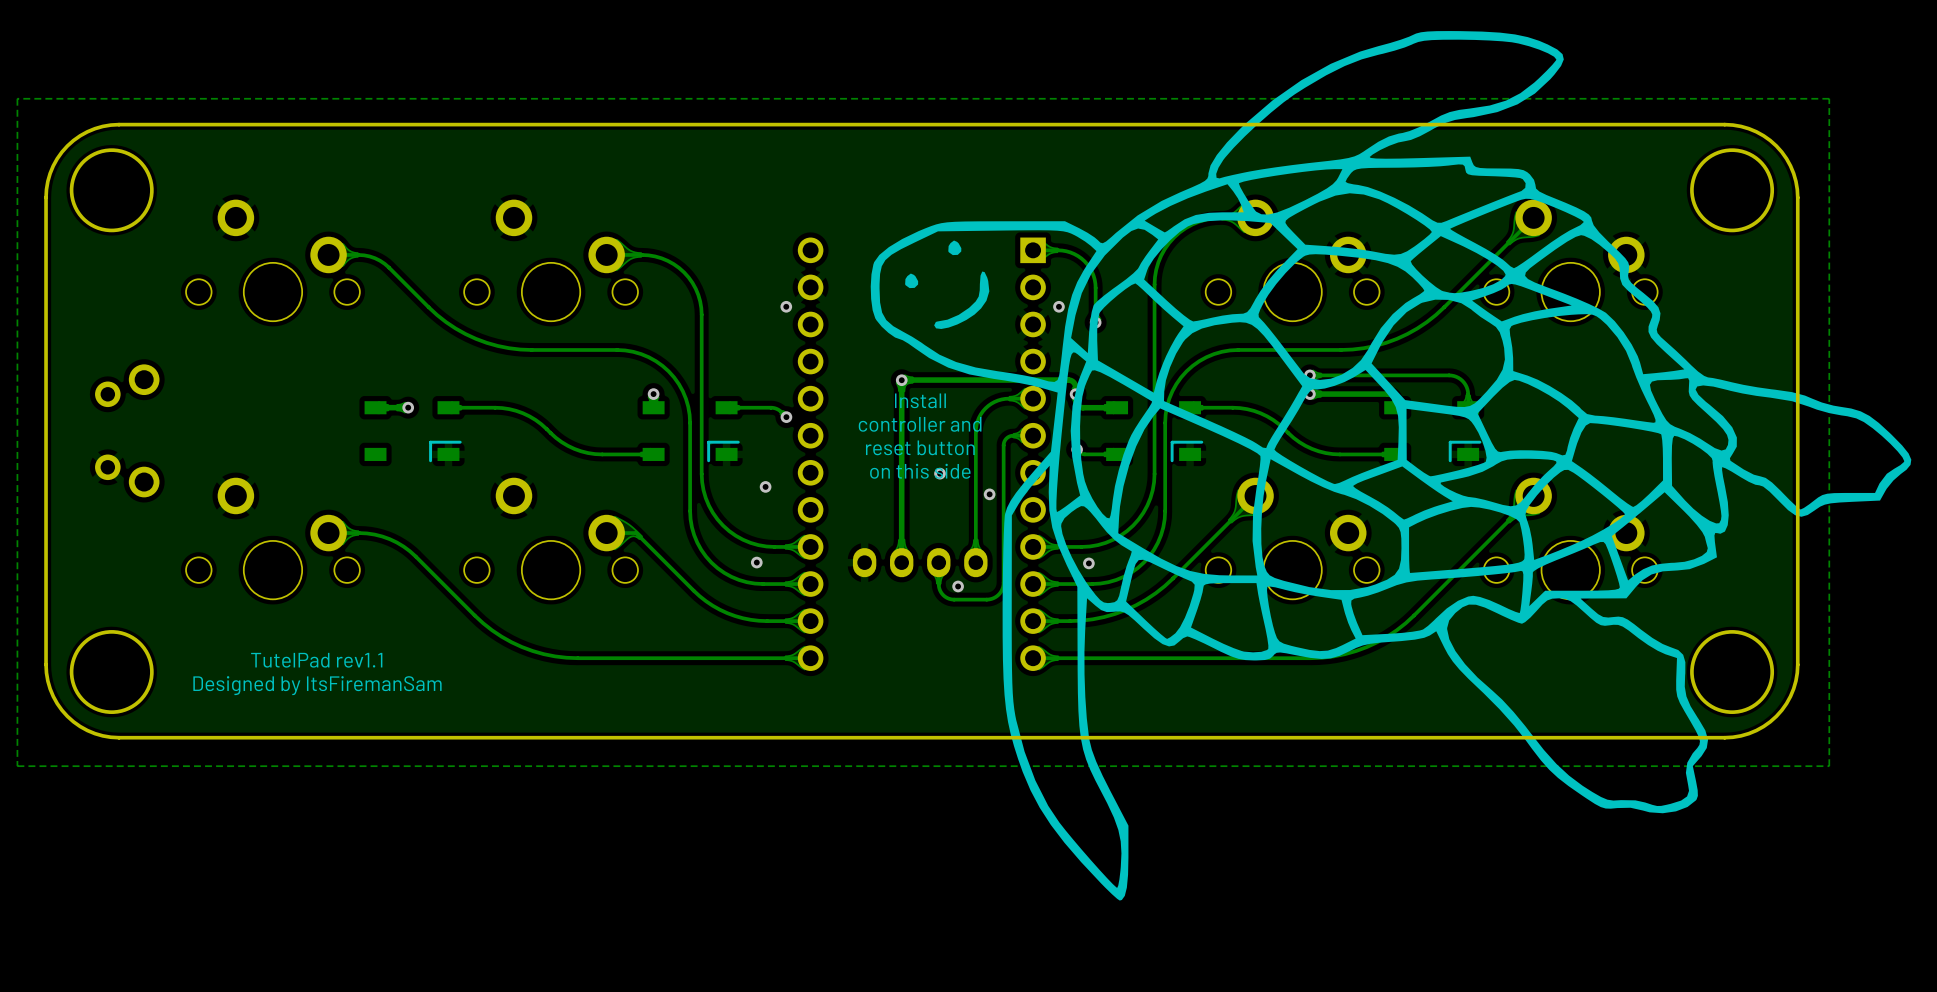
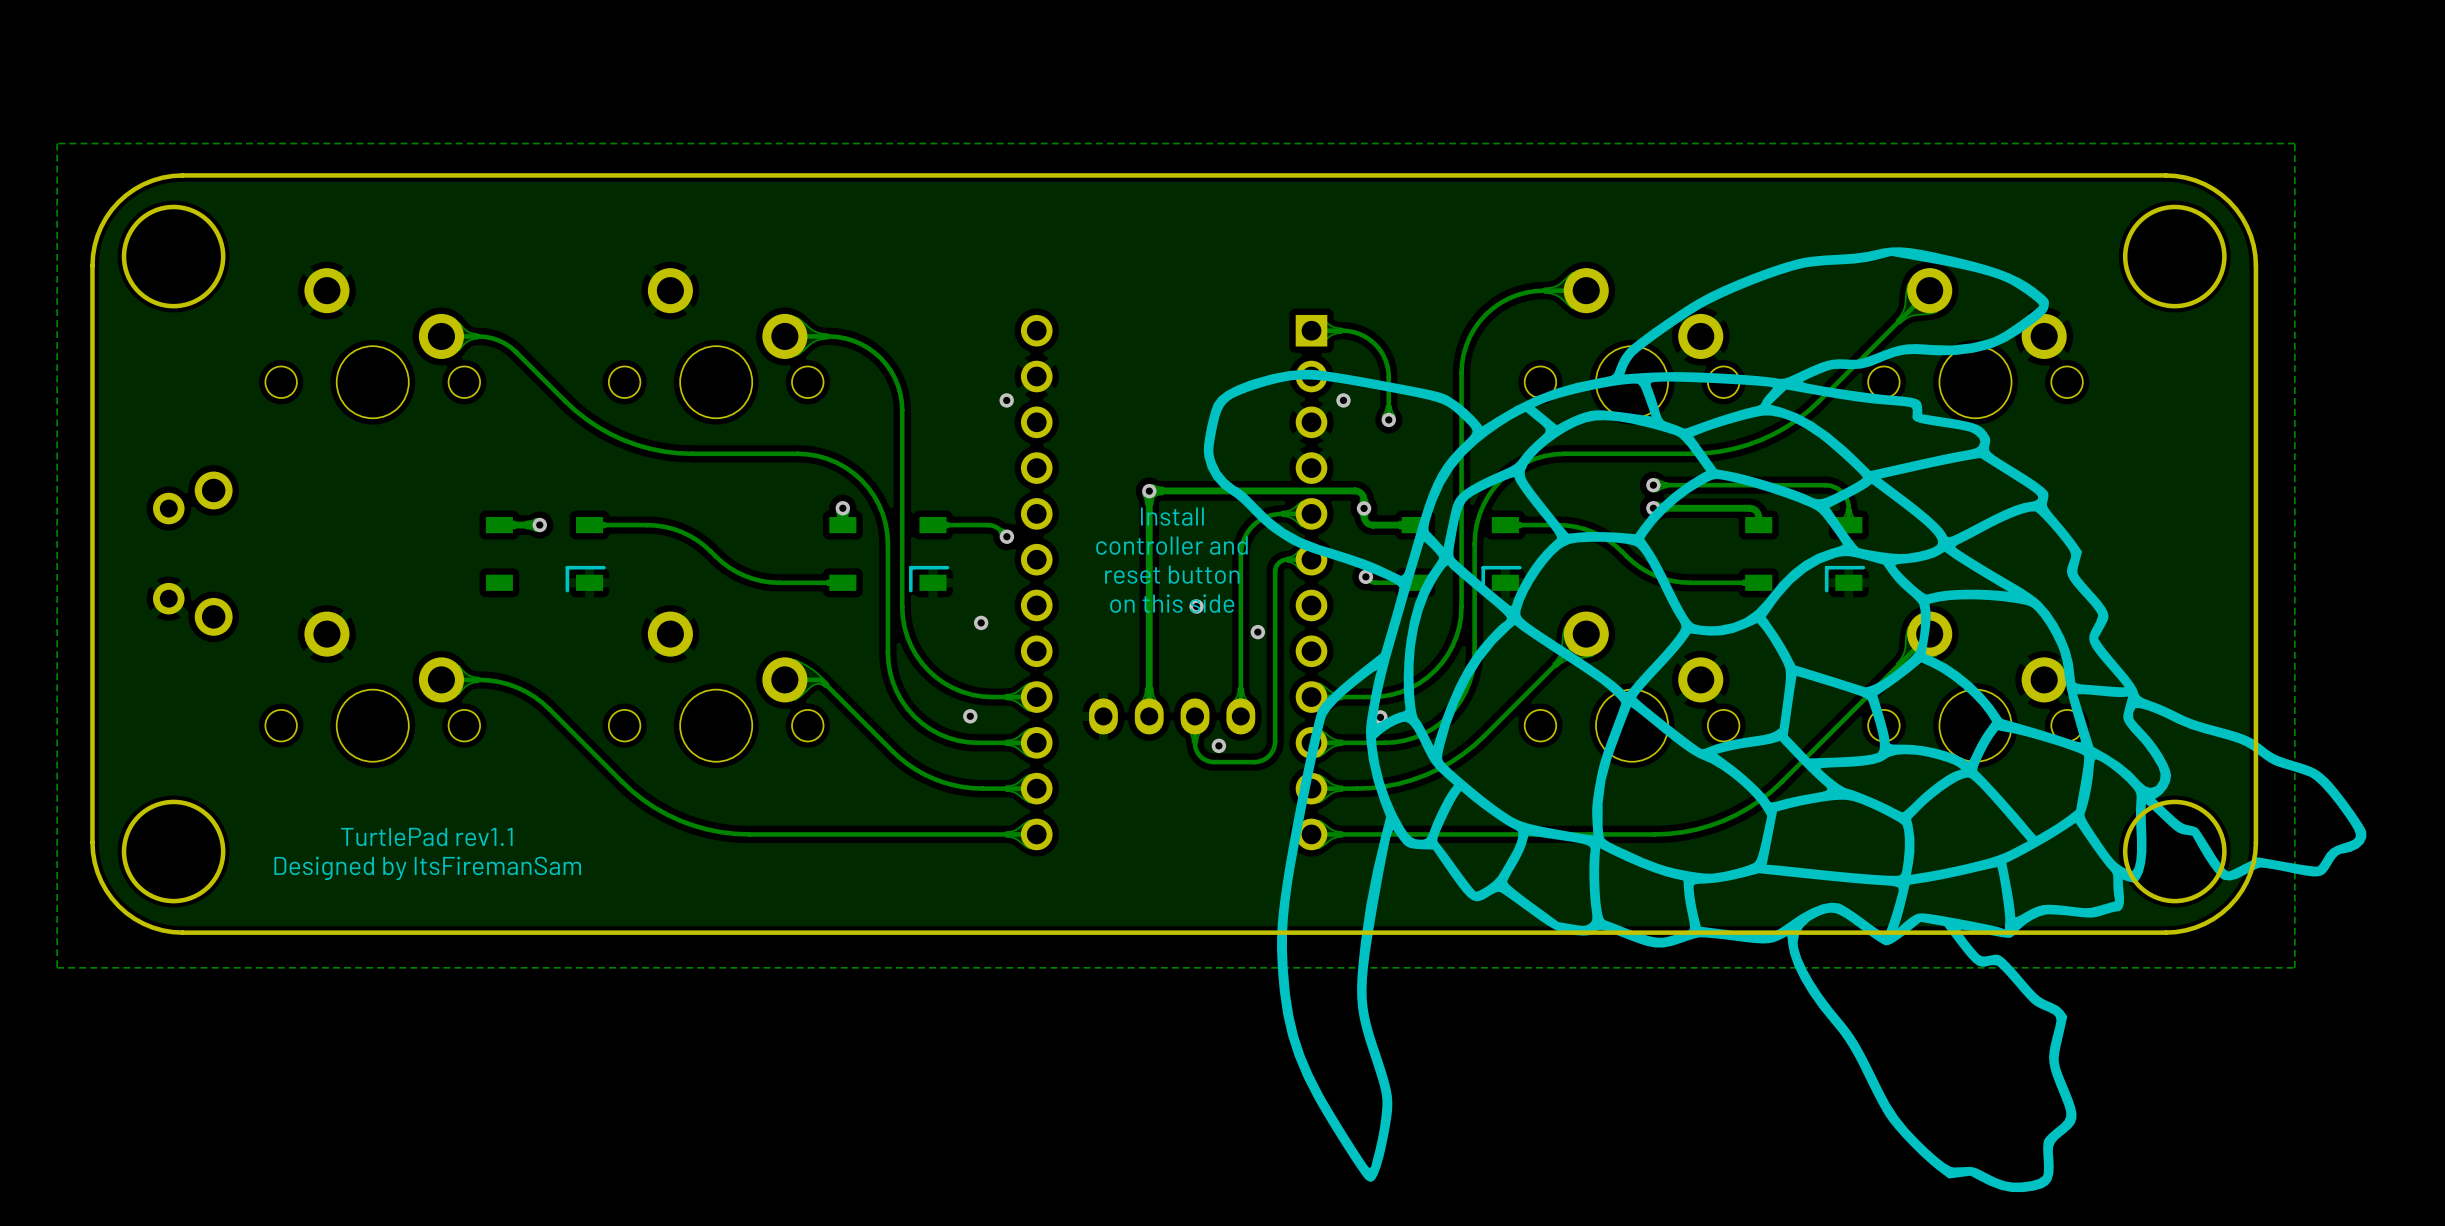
drawing: [870, 31, 1912, 901] -> none
drawing: none -> [1203, 247, 2367, 1193]
text: TutelPad rev1.1 (316, 660) -> TurtlePad rev1.1 (426, 836)

